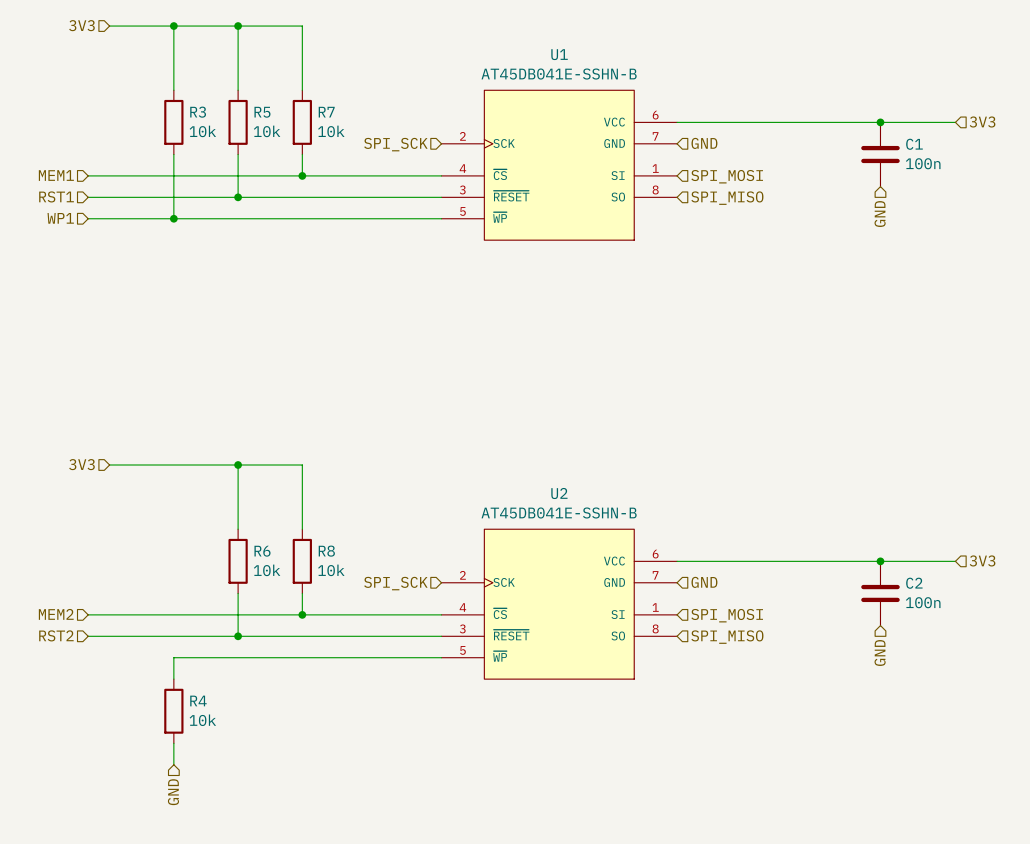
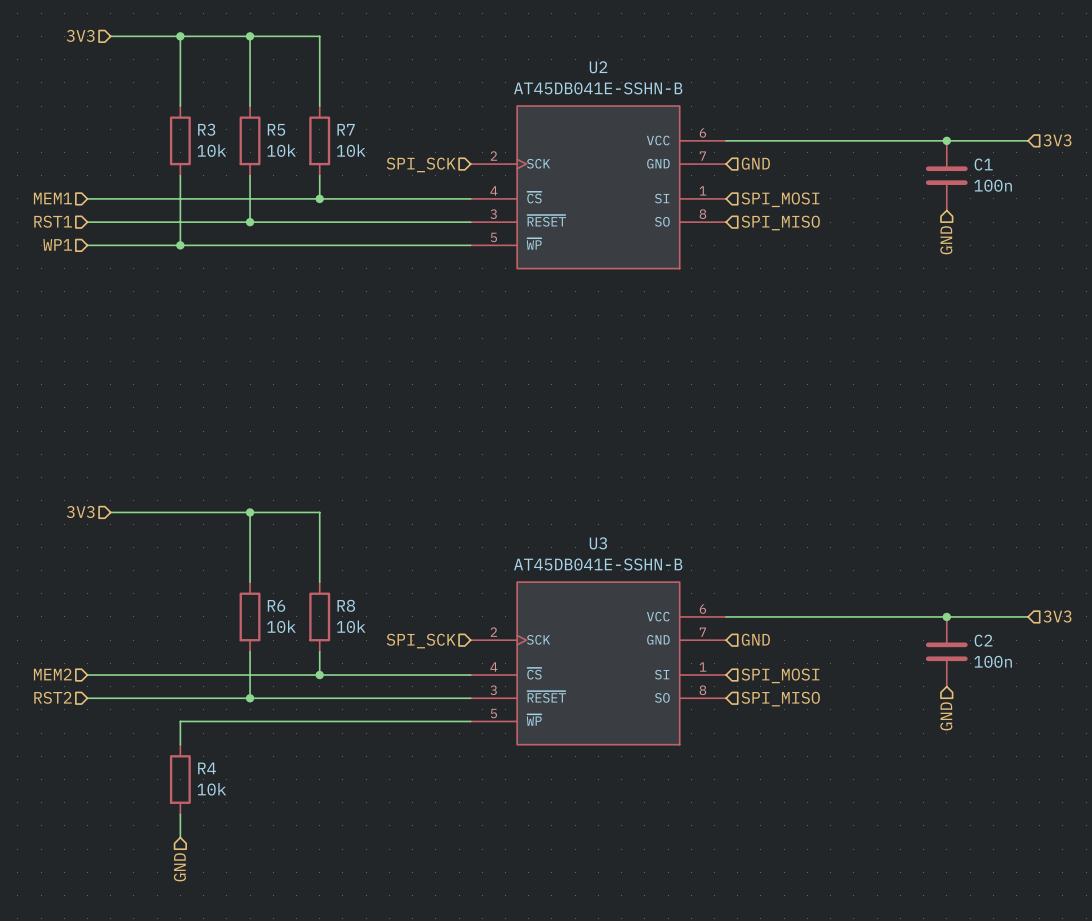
U1 name: U1 (559, 54) -> U2 (598, 67)
U2 name: U2 (559, 493) -> U3 (598, 543)

